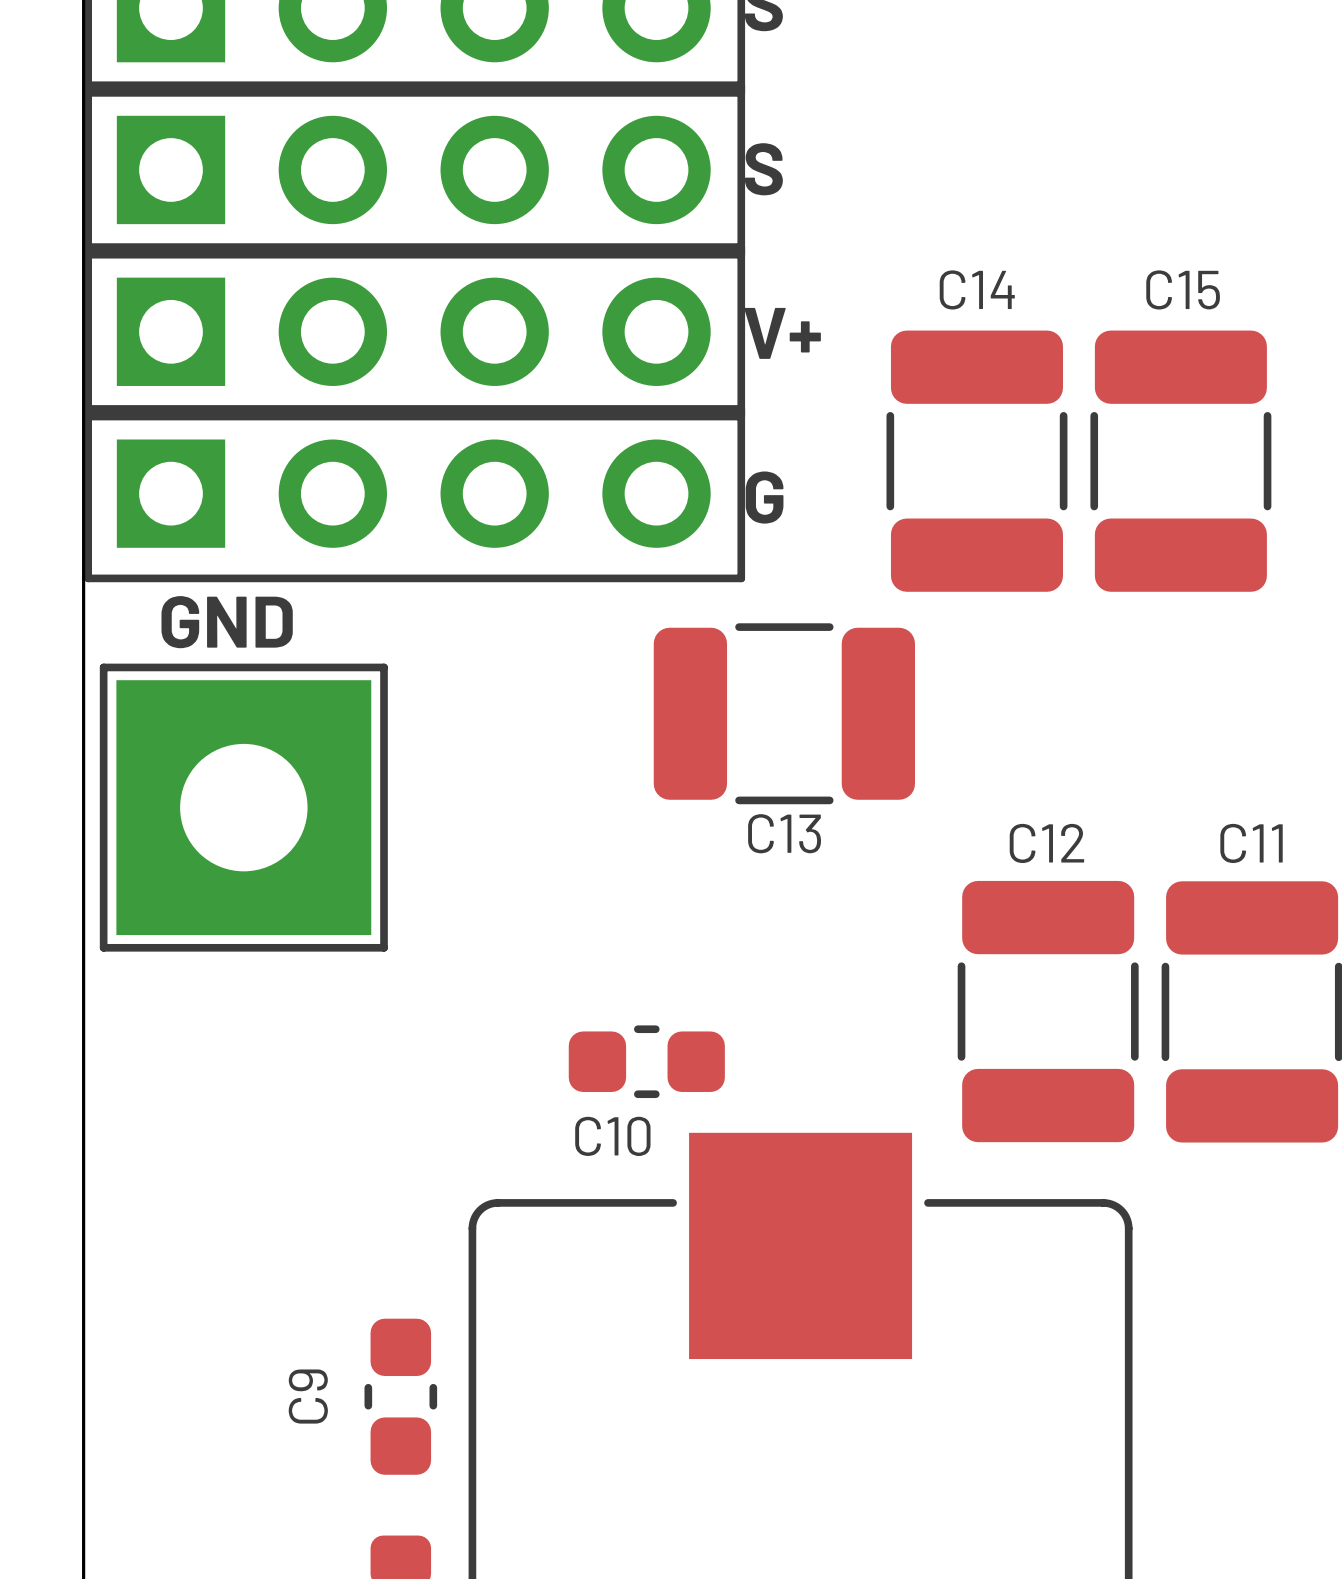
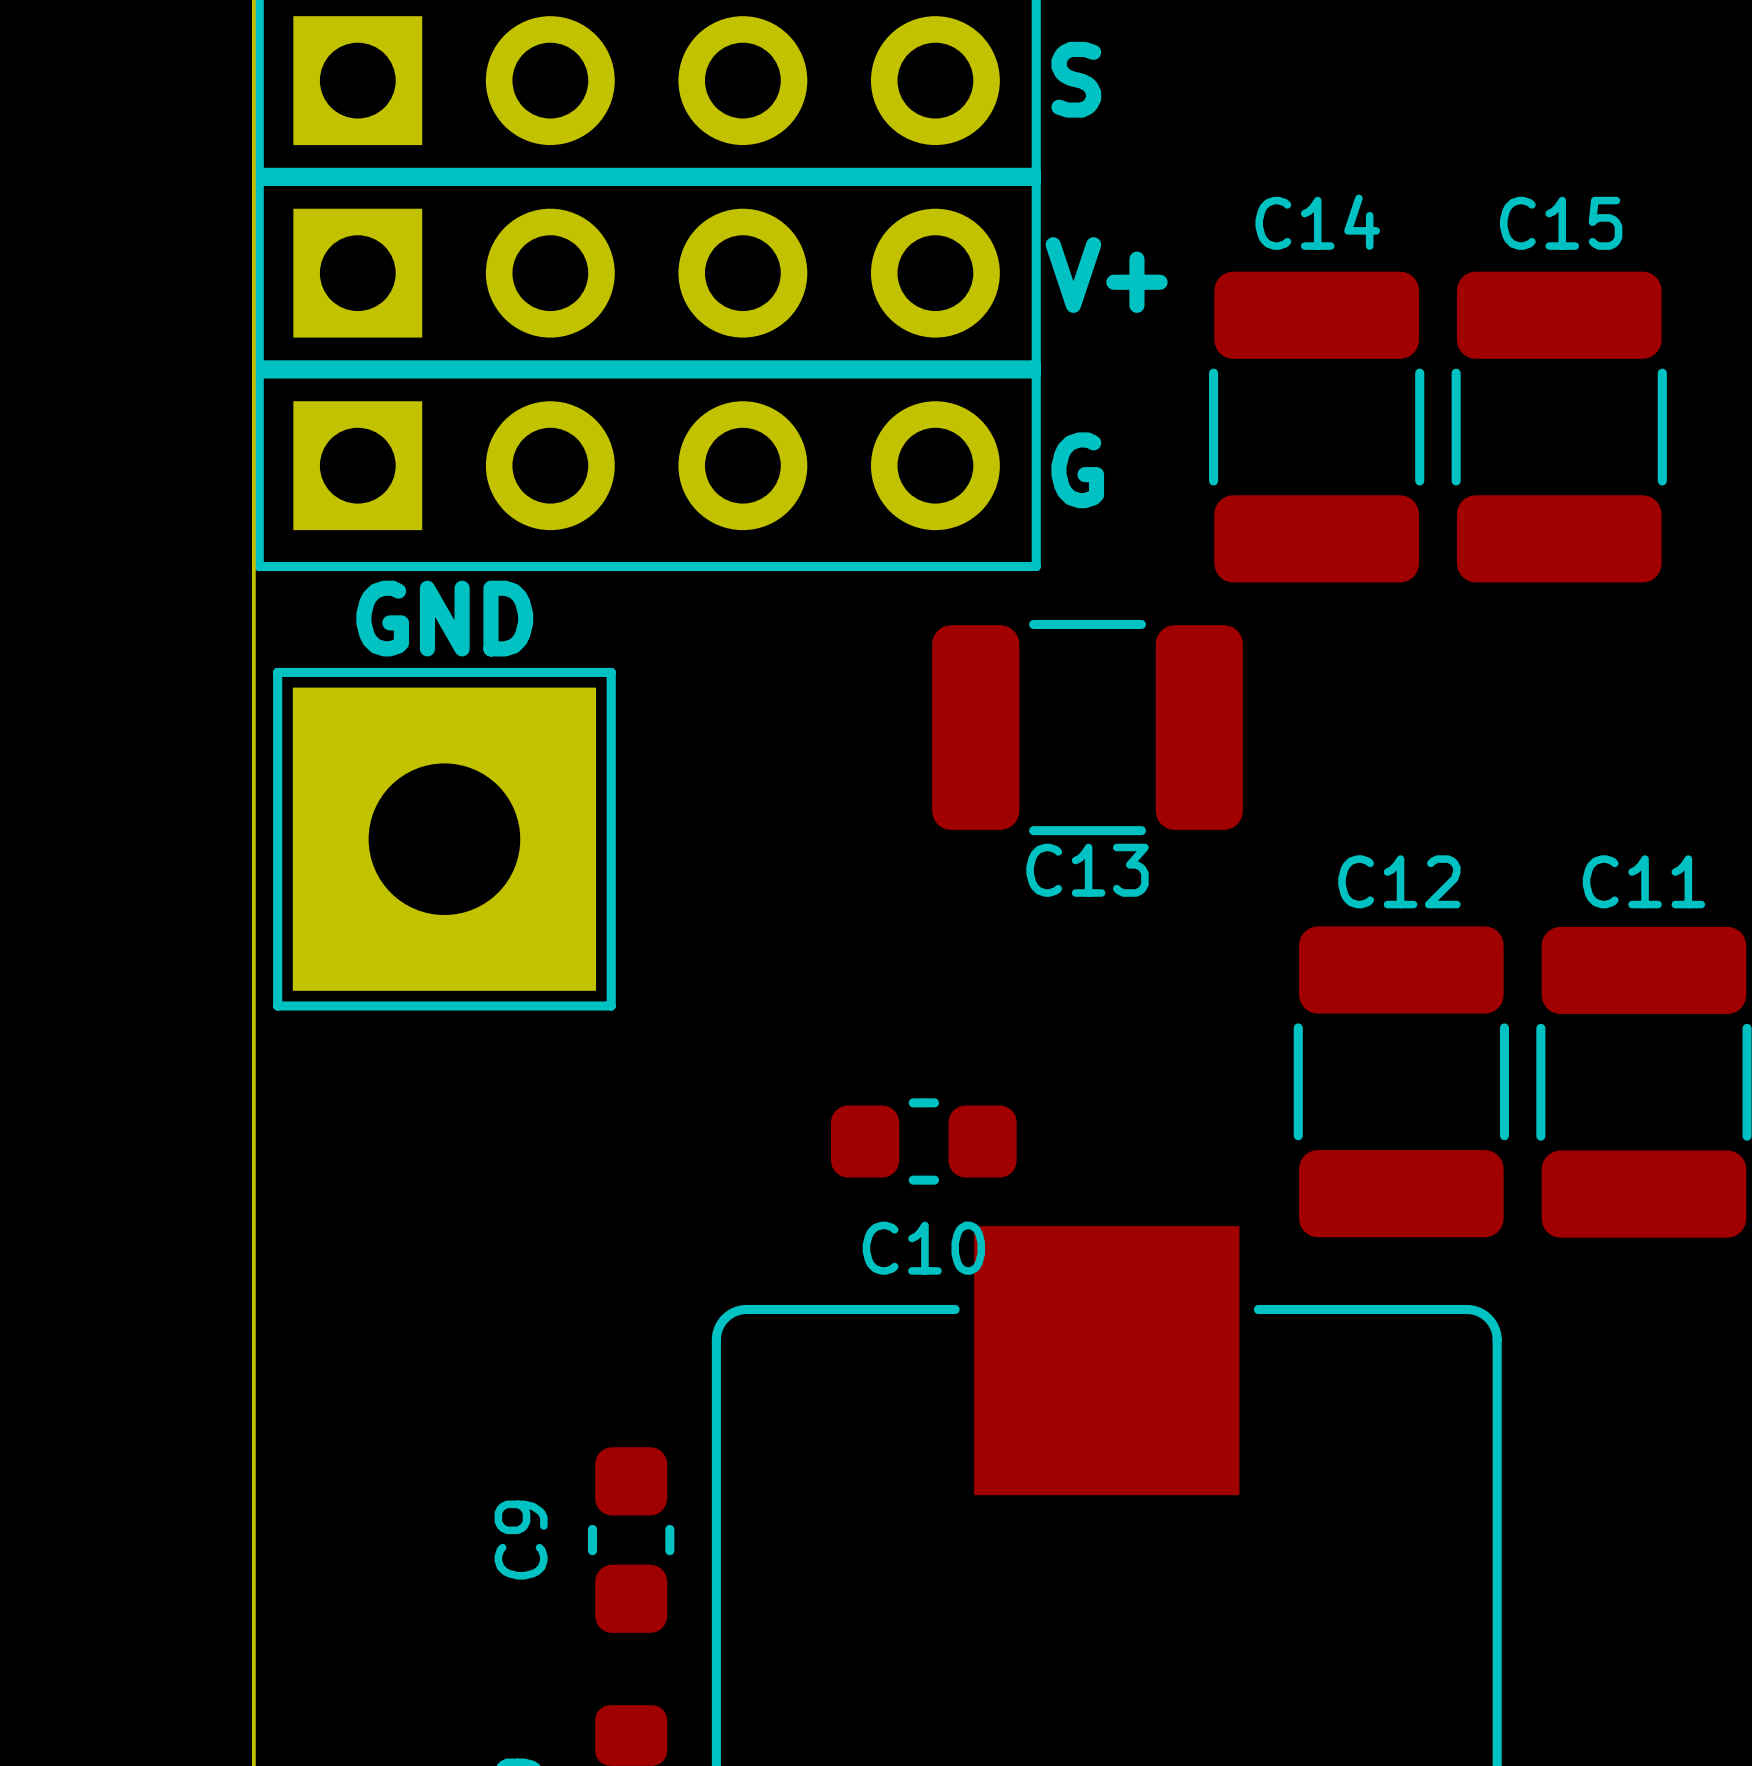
C10 name position: C10 (612, 1136) -> C10 (923, 1248)

